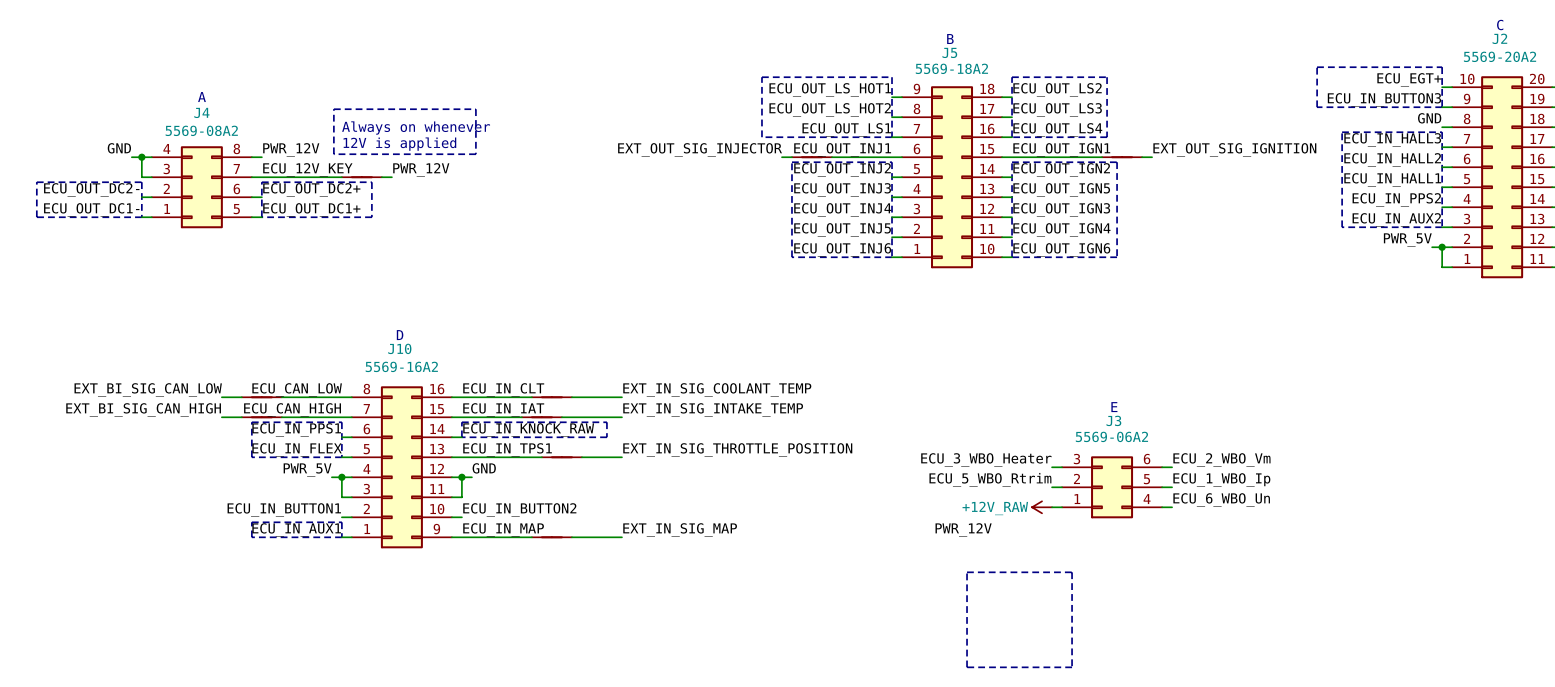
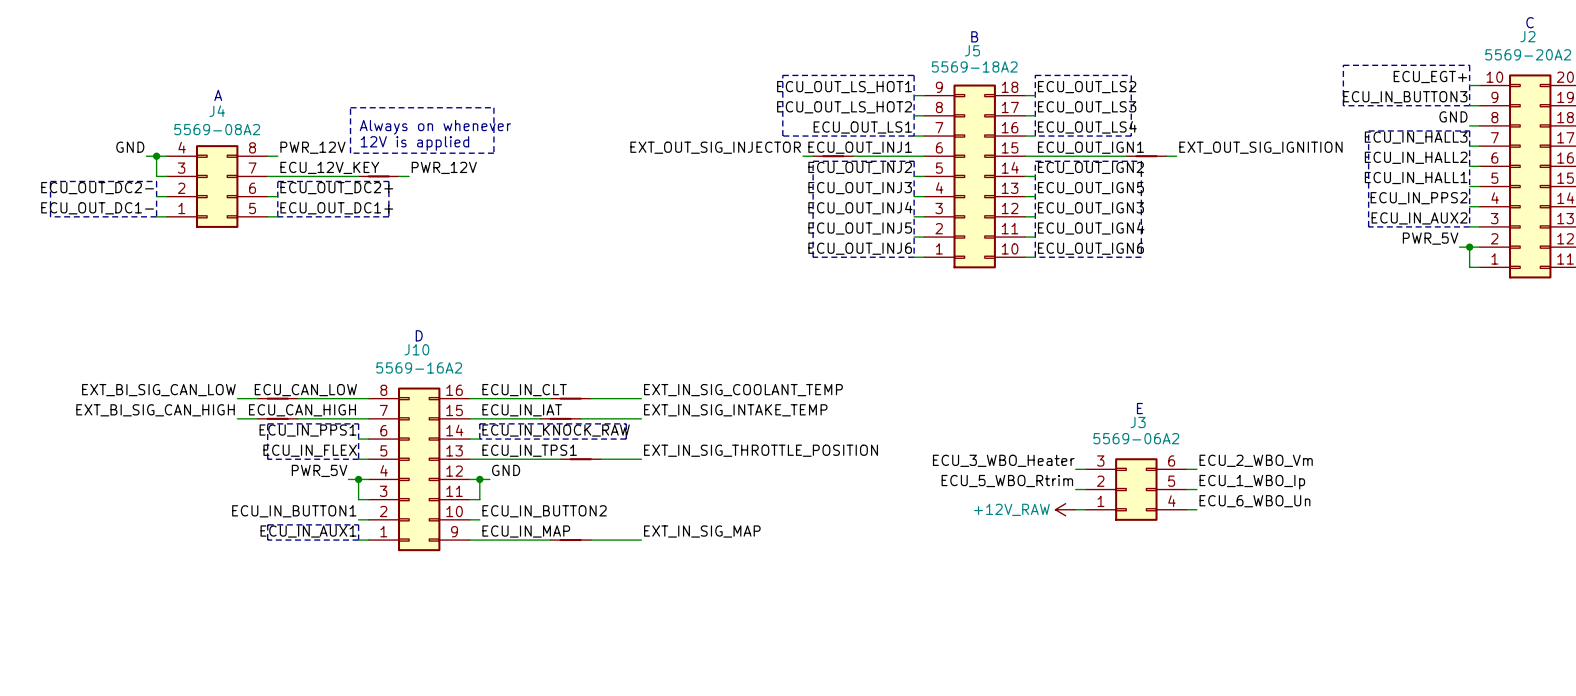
label: PWR_12V (963, 529) -> none
line: (967, 572) (1072, 572) (1072, 667) (967, 667) (967, 572) -> none

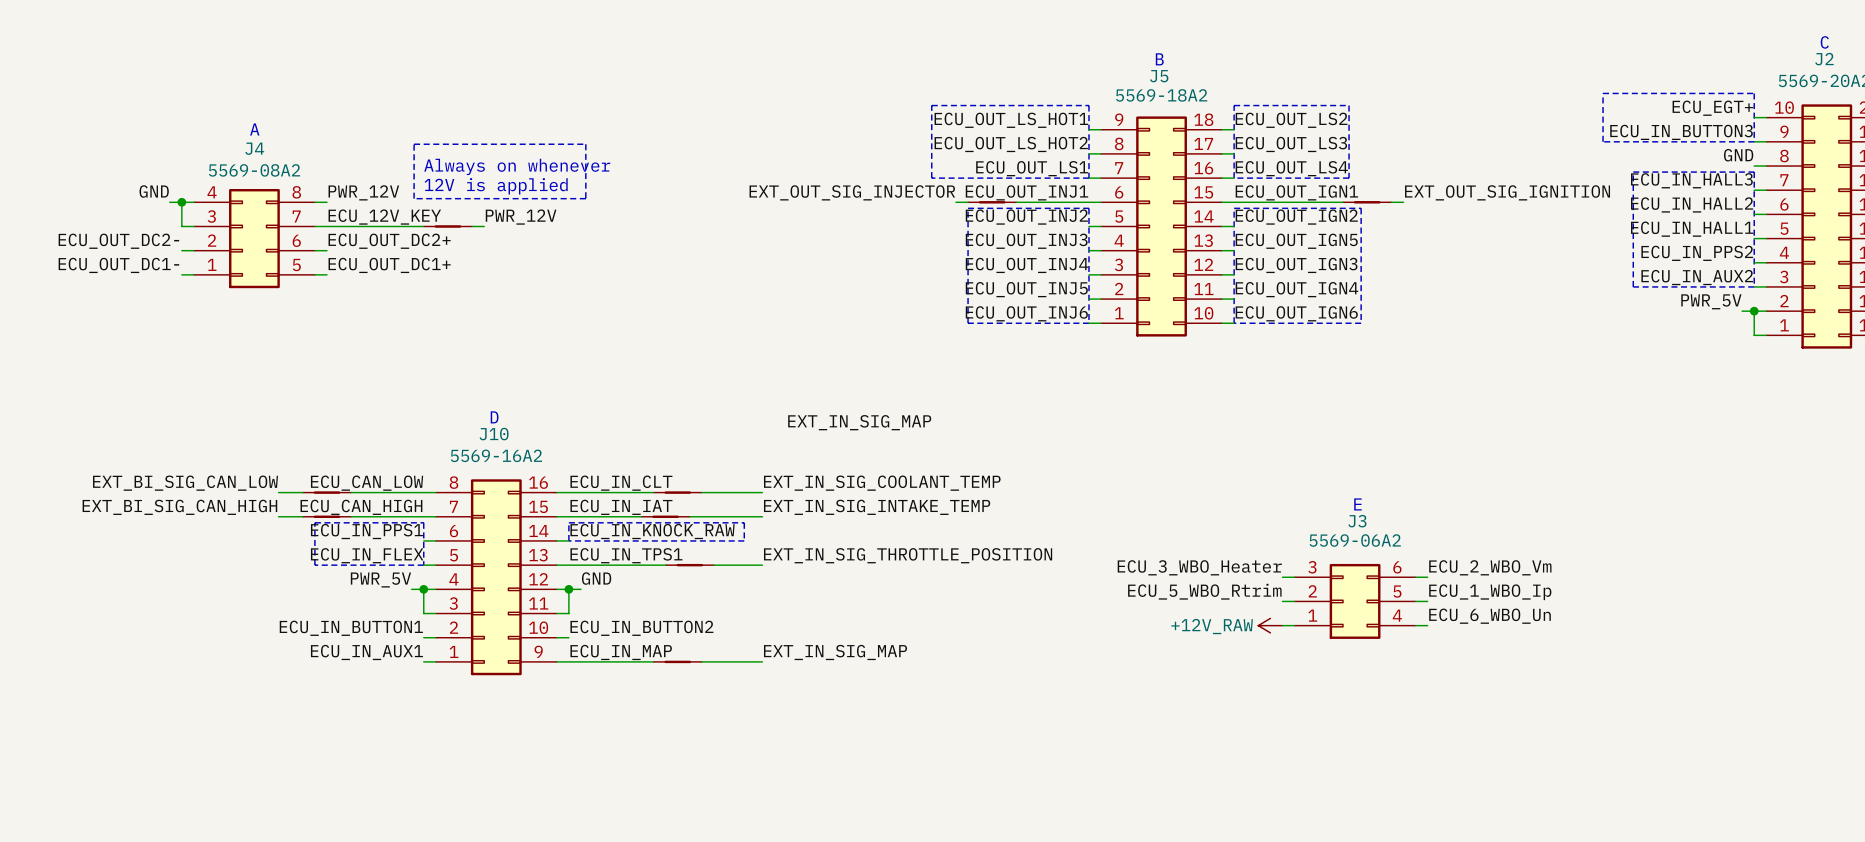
line: (50, 181) (156, 181) (156, 216) (50, 216) (50, 181) -> none
line: (277, 181) (388, 181) (388, 216) (277, 216) (277, 181) -> none
label: none -> EXT_IN_SIG_MAP (859, 422)
line: (267, 524) (267, 540) (358, 540) (358, 524) (267, 524) -> none

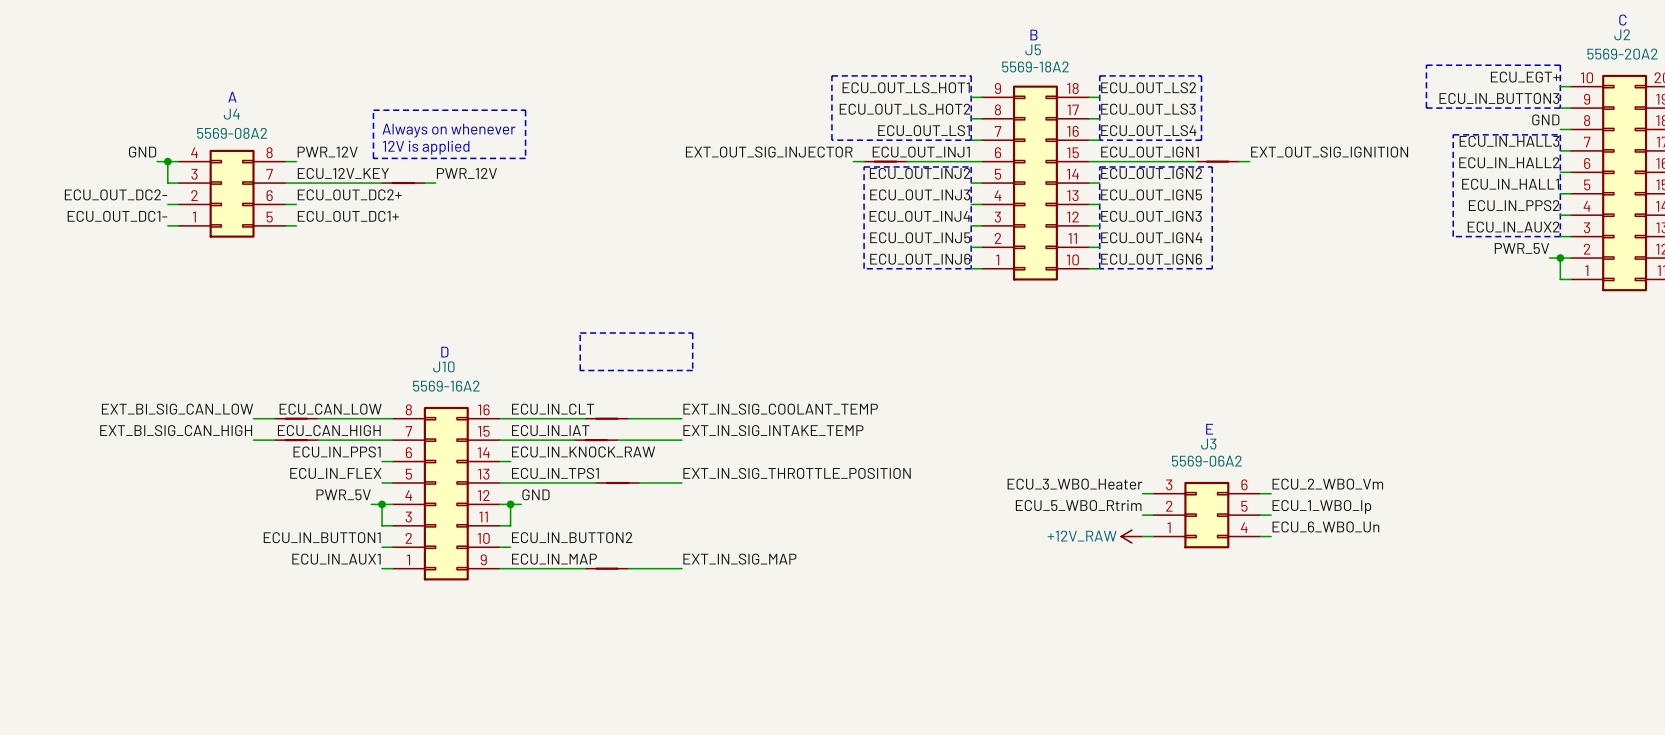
line: none -> (580, 333) (692, 333) (692, 370) (580, 370) (580, 333)
label: EXT_IN_SIG_MAP (859, 422) -> none
line: (314, 522) (423, 522) (423, 565) (314, 565) (314, 522) -> none
line: (568, 522) (744, 522) (744, 540) (568, 540) (568, 522) -> none

